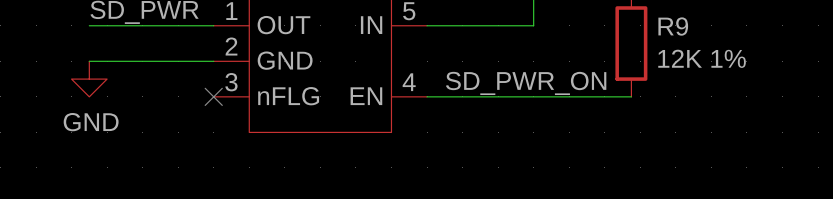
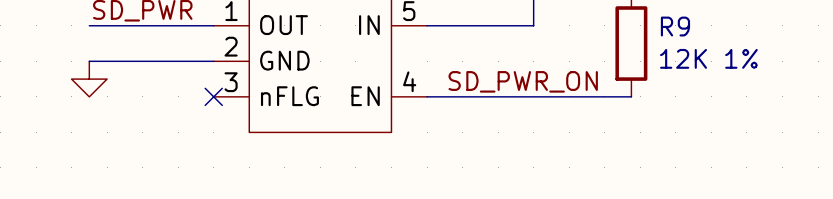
power symbol text: GND (91, 122) -> none

